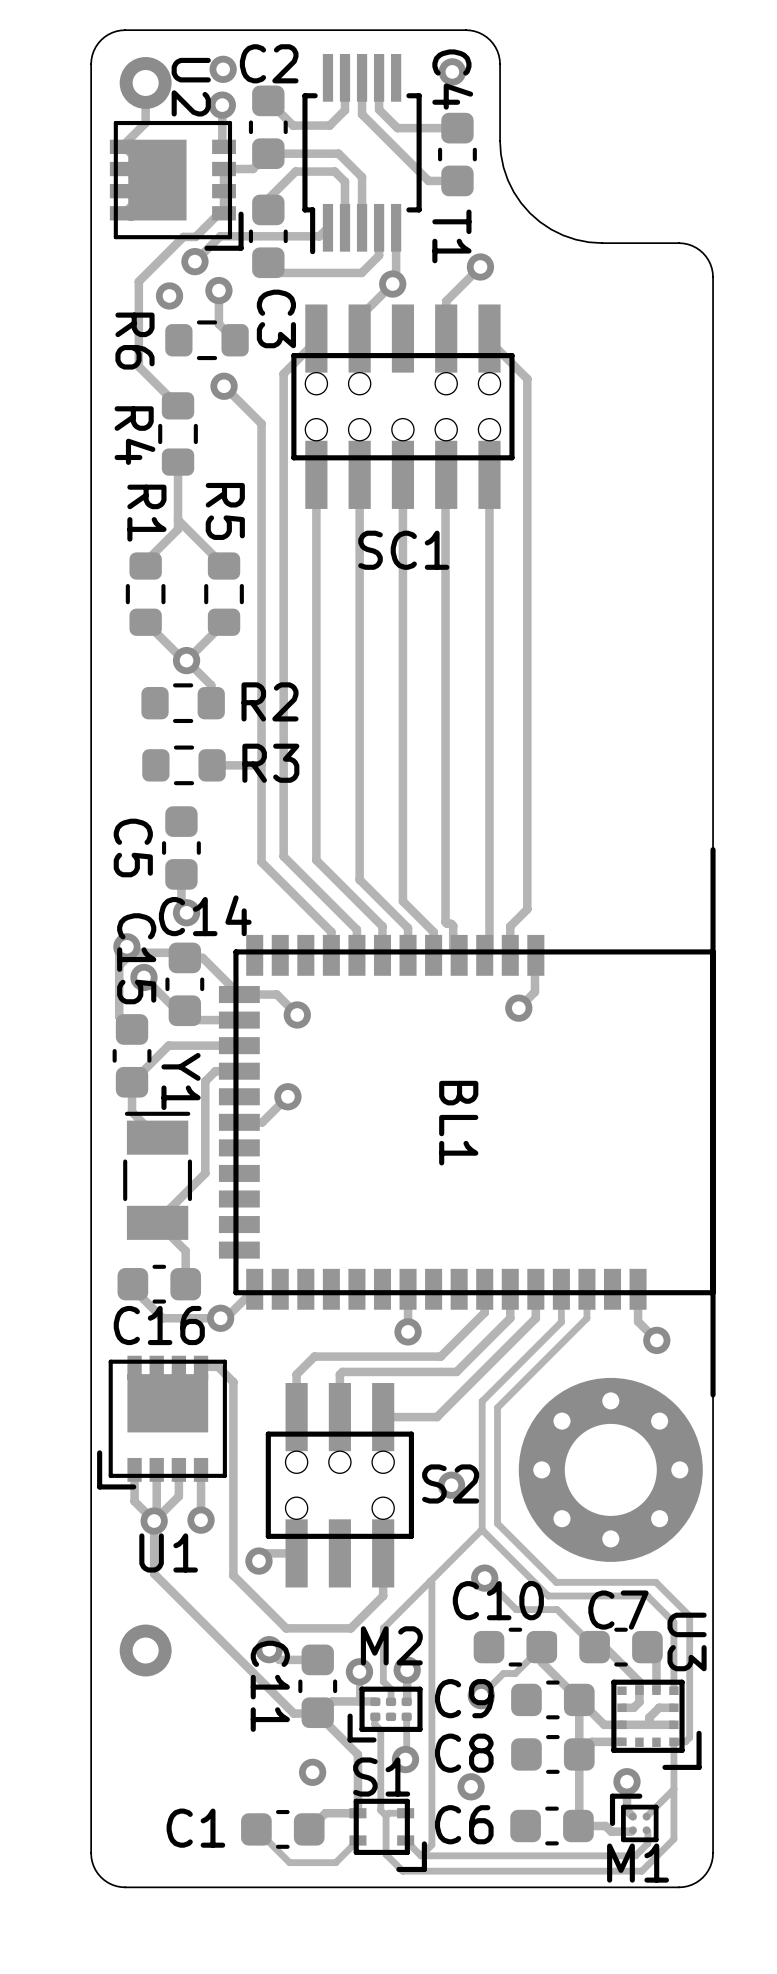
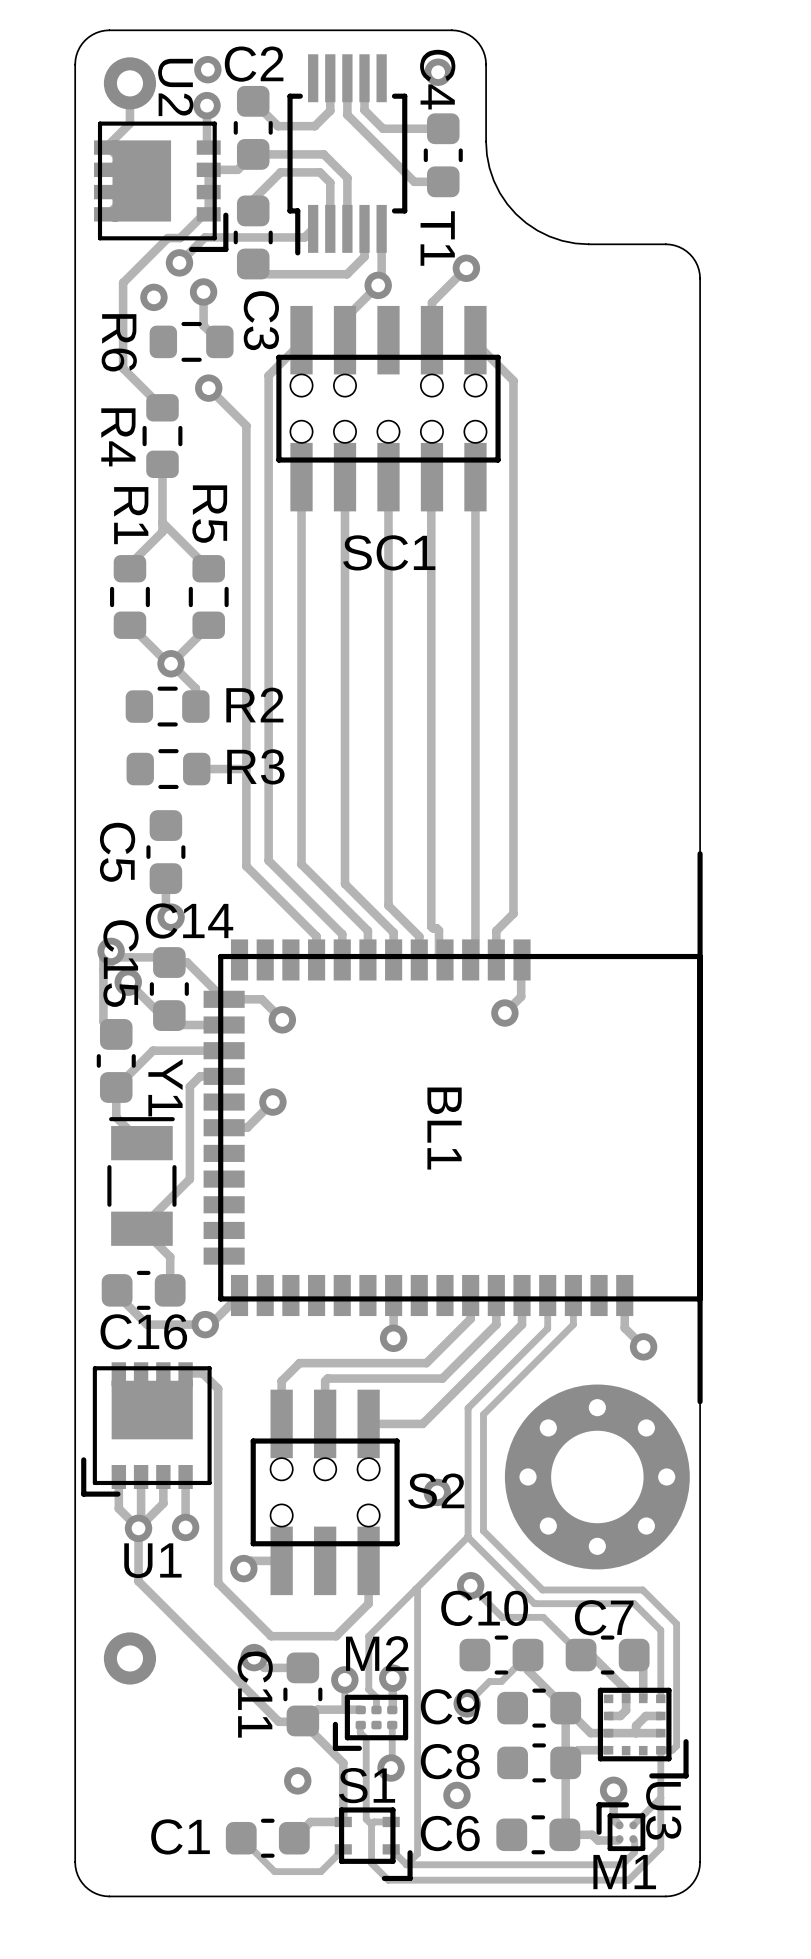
U3 name position: U3 (687, 1641) -> U3 (663, 1810)

